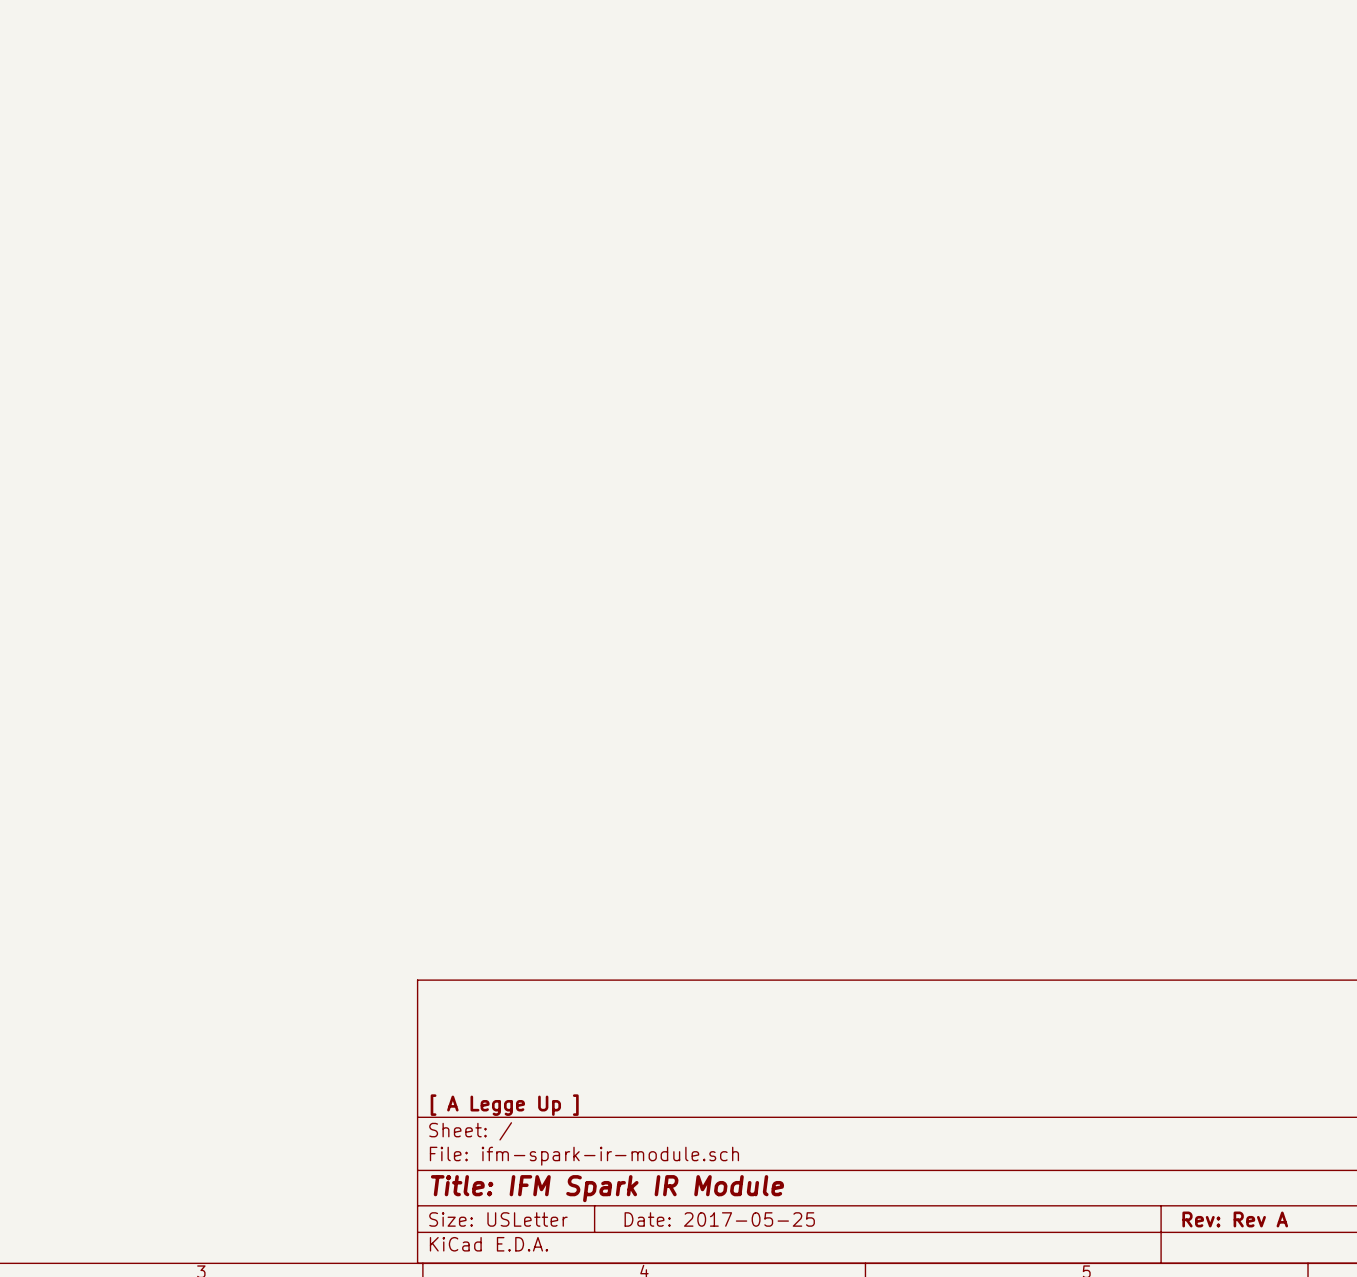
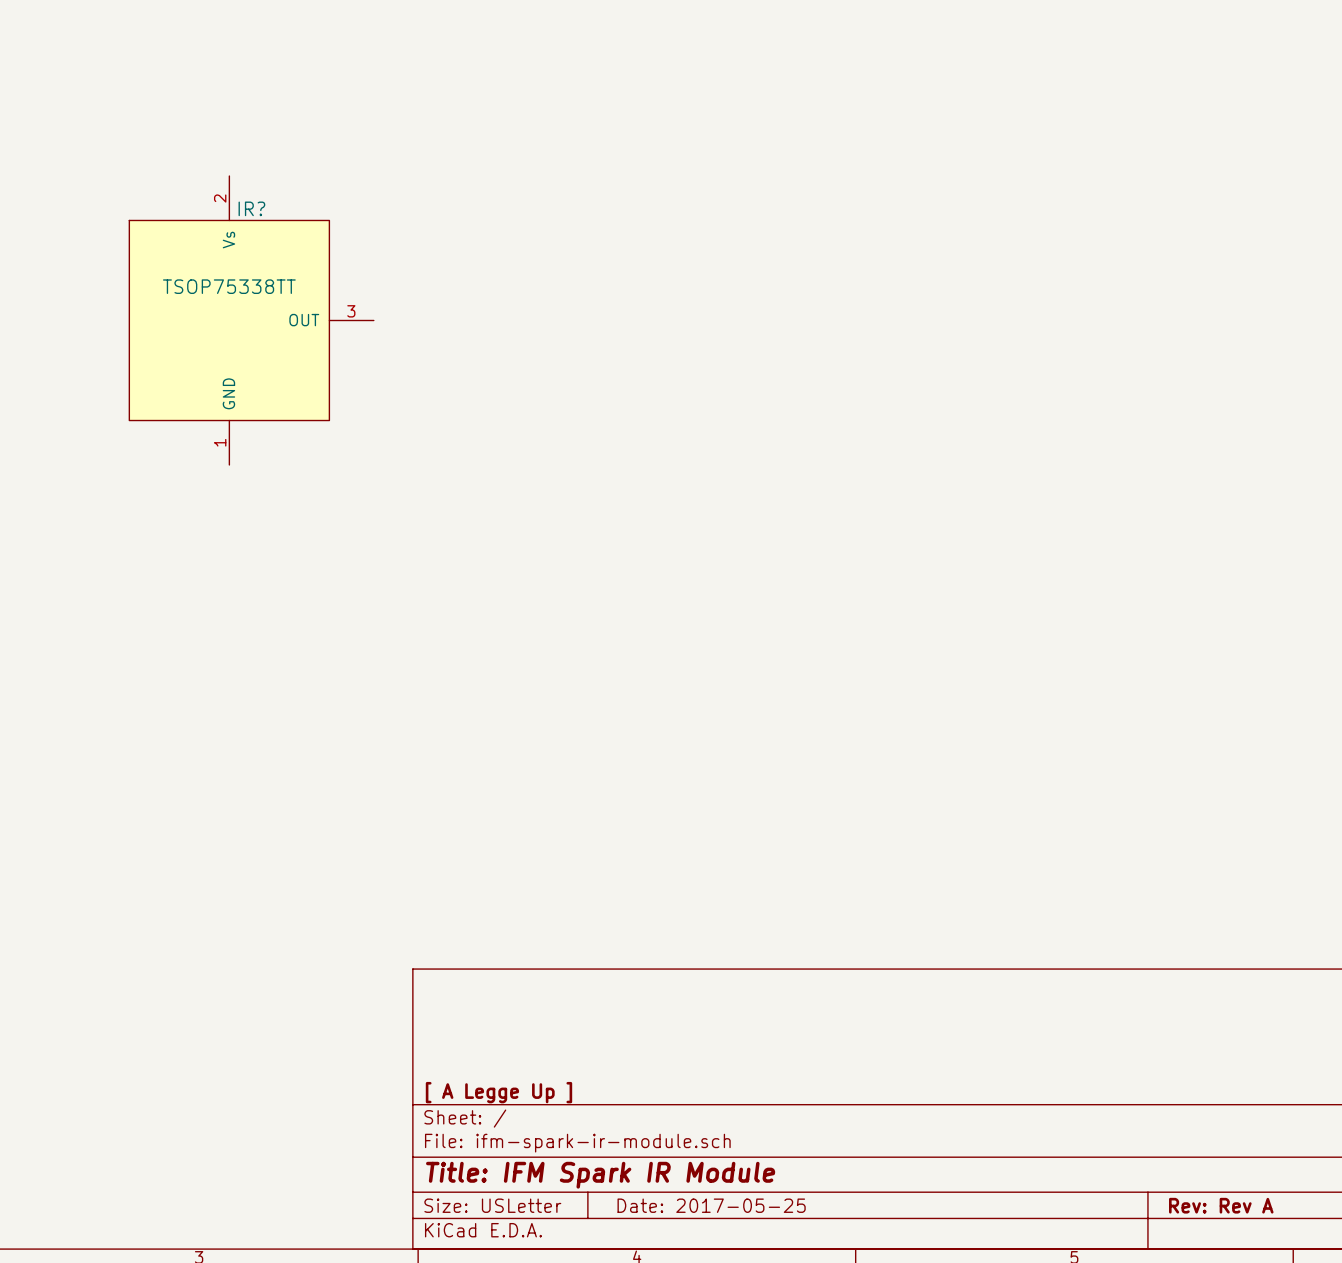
IR?: none -> TSOP75338TT (251, 320)

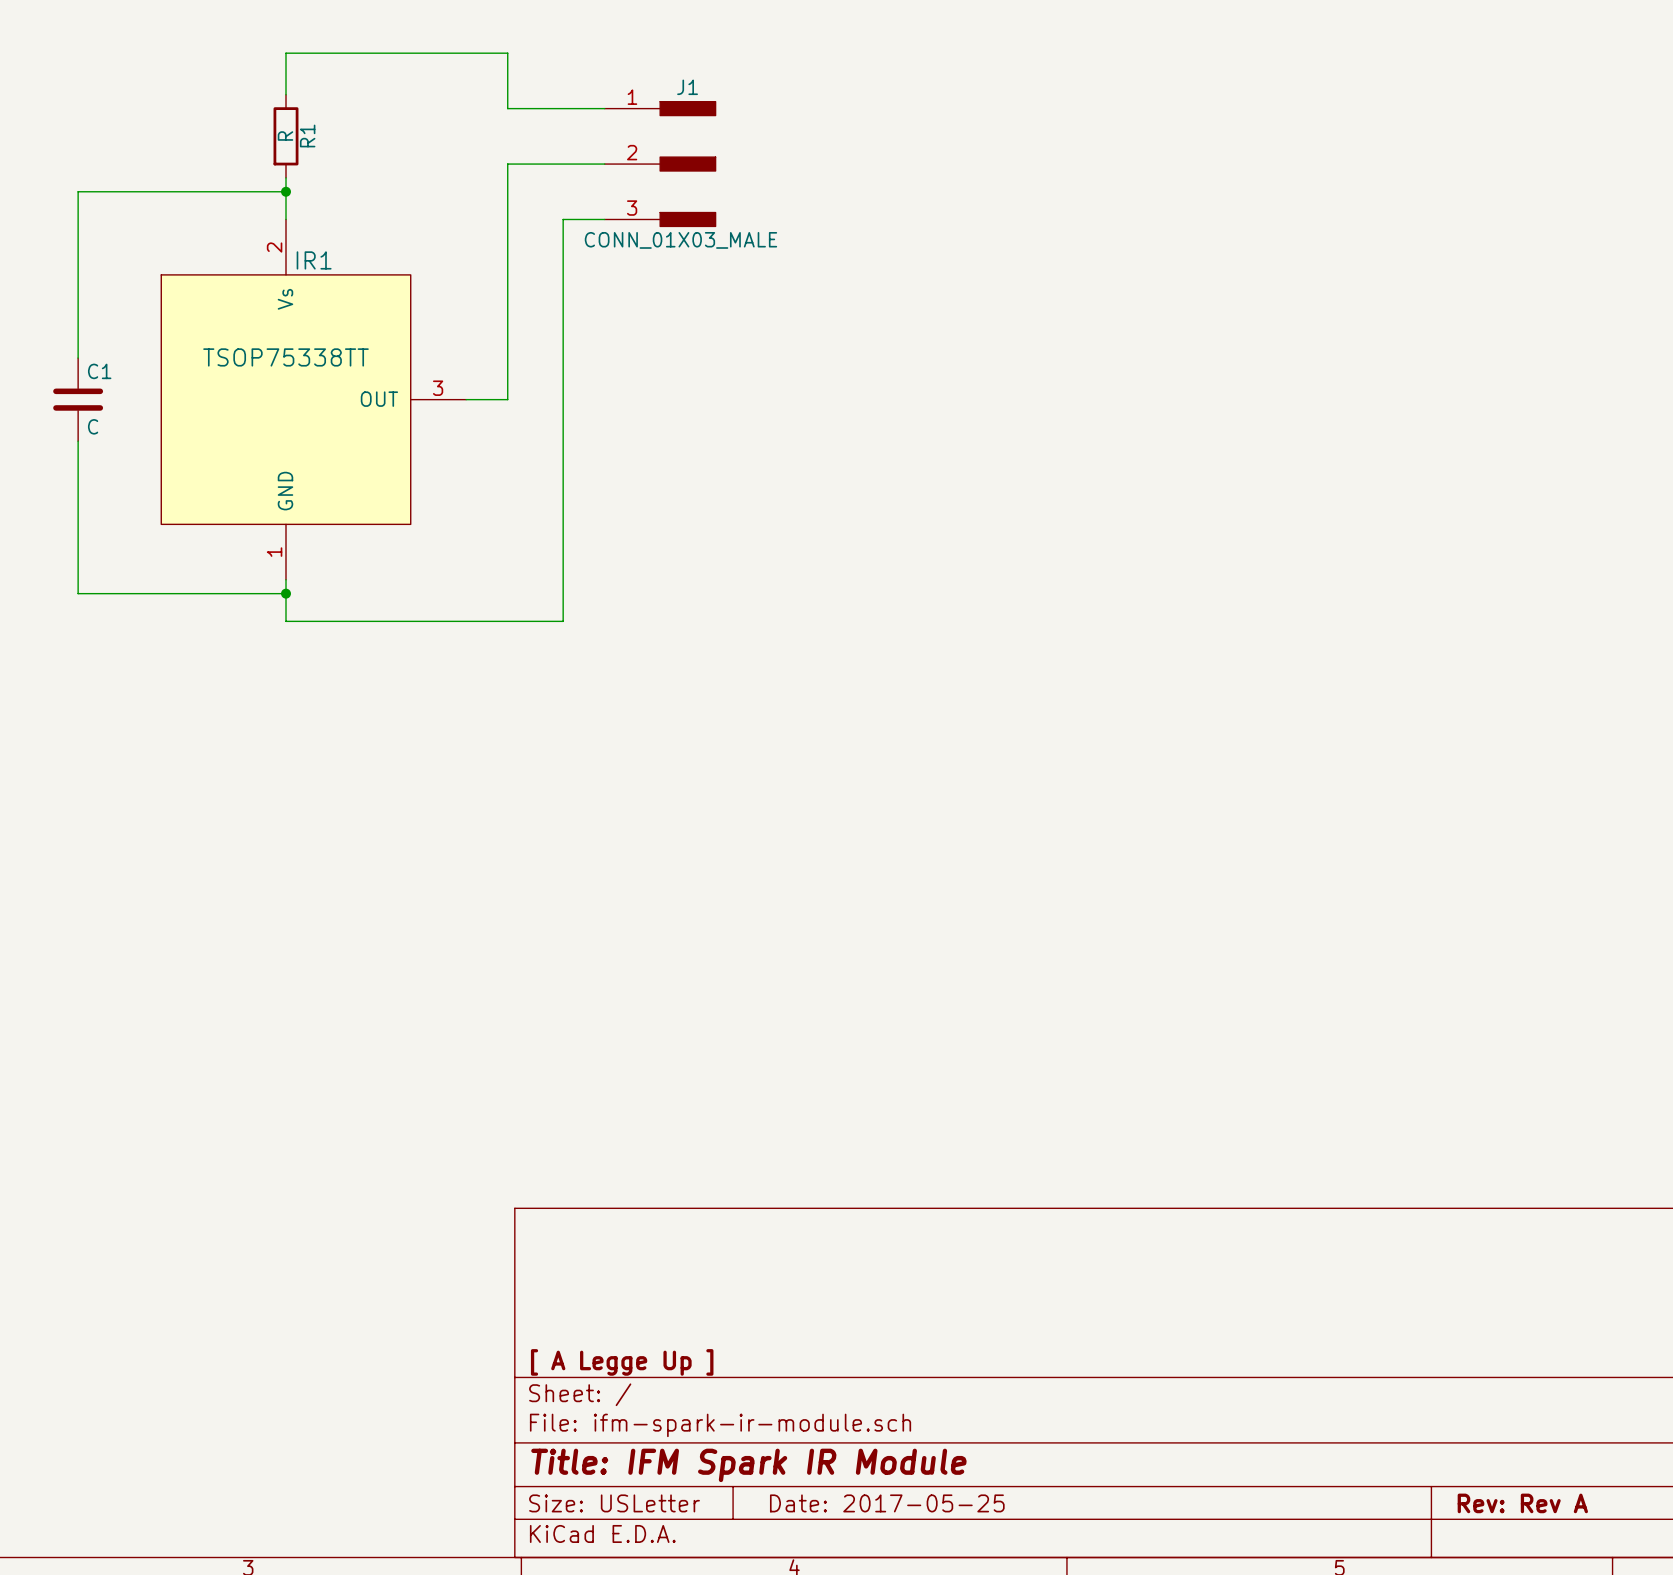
wire: none -> (286, 94) (286, 53) (507, 53) (507, 108) (604, 108)
R1: none -> R (286, 136)
wire: none -> (604, 164) (507, 164) (507, 399) (466, 399)
J1: none -> CONN_01X03_MALE (660, 164)
wire: none -> (286, 177) (286, 219)
wire: none -> (286, 191) (78, 191) (78, 358)
junction: none -> (286, 191)
wire: none -> (604, 219) (563, 219) (563, 621) (286, 621) (286, 579)
IR? name: IR? (251, 208) -> IR1 (314, 260)
C1: none -> C (78, 399)
wire: none -> (78, 441) (78, 593) (286, 593)
junction: none -> (286, 593)

